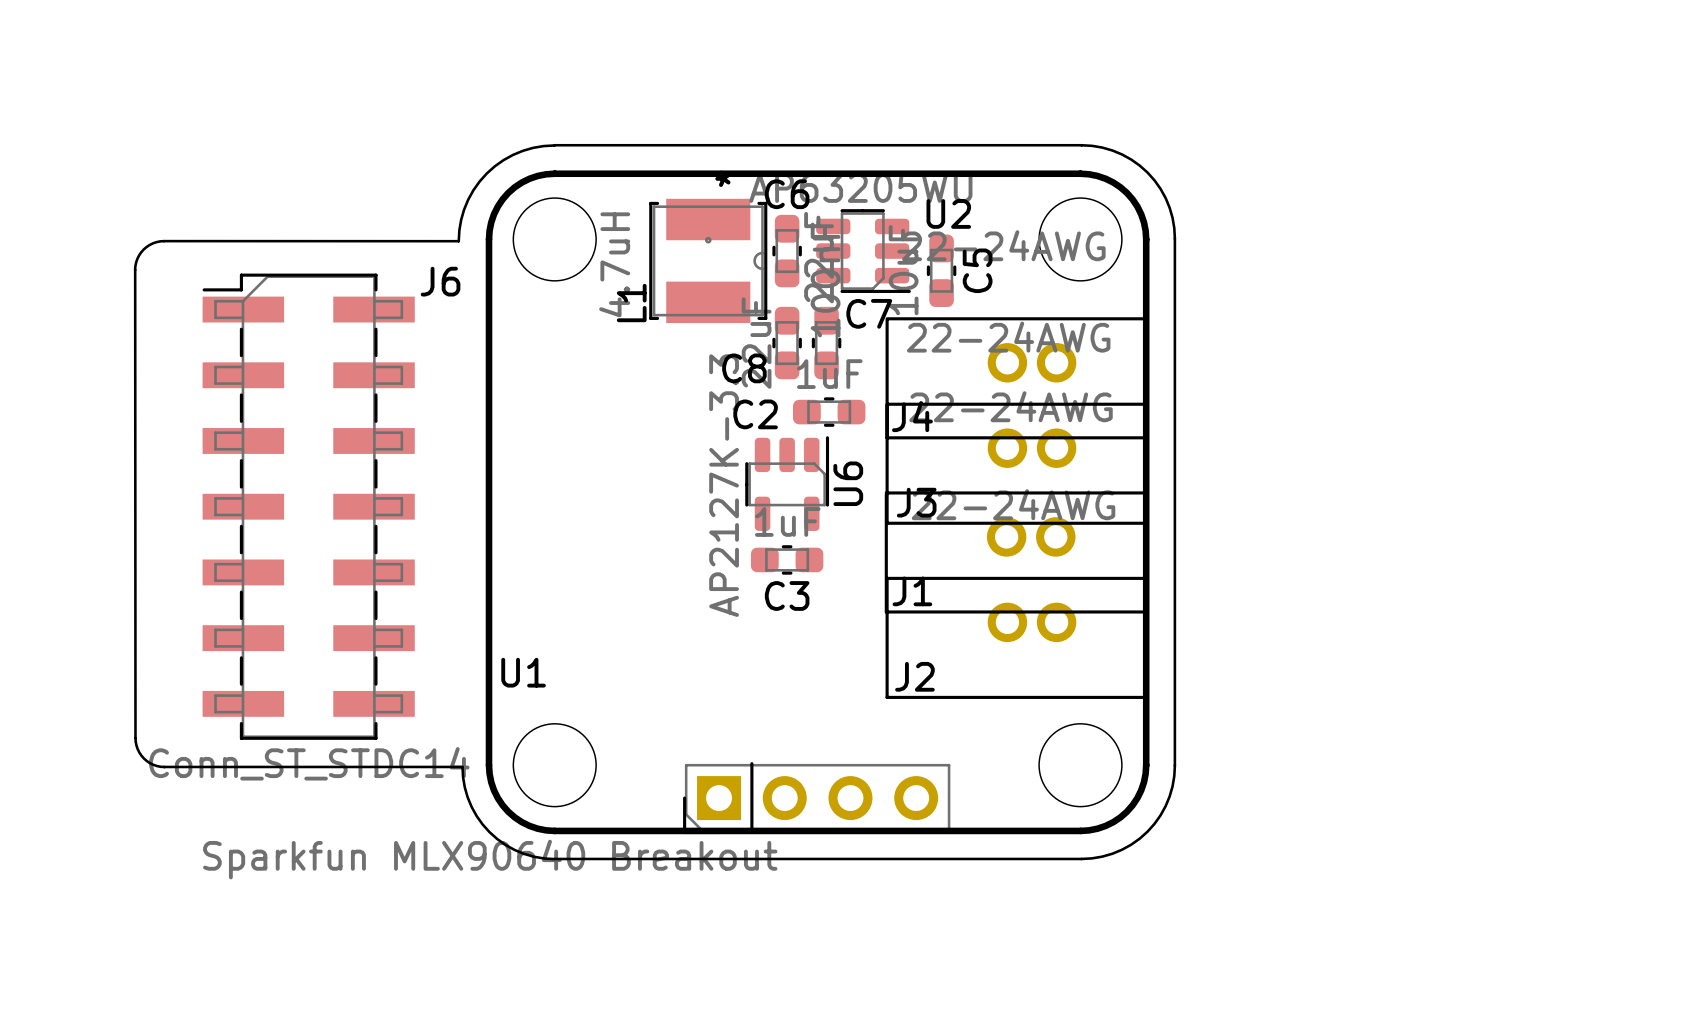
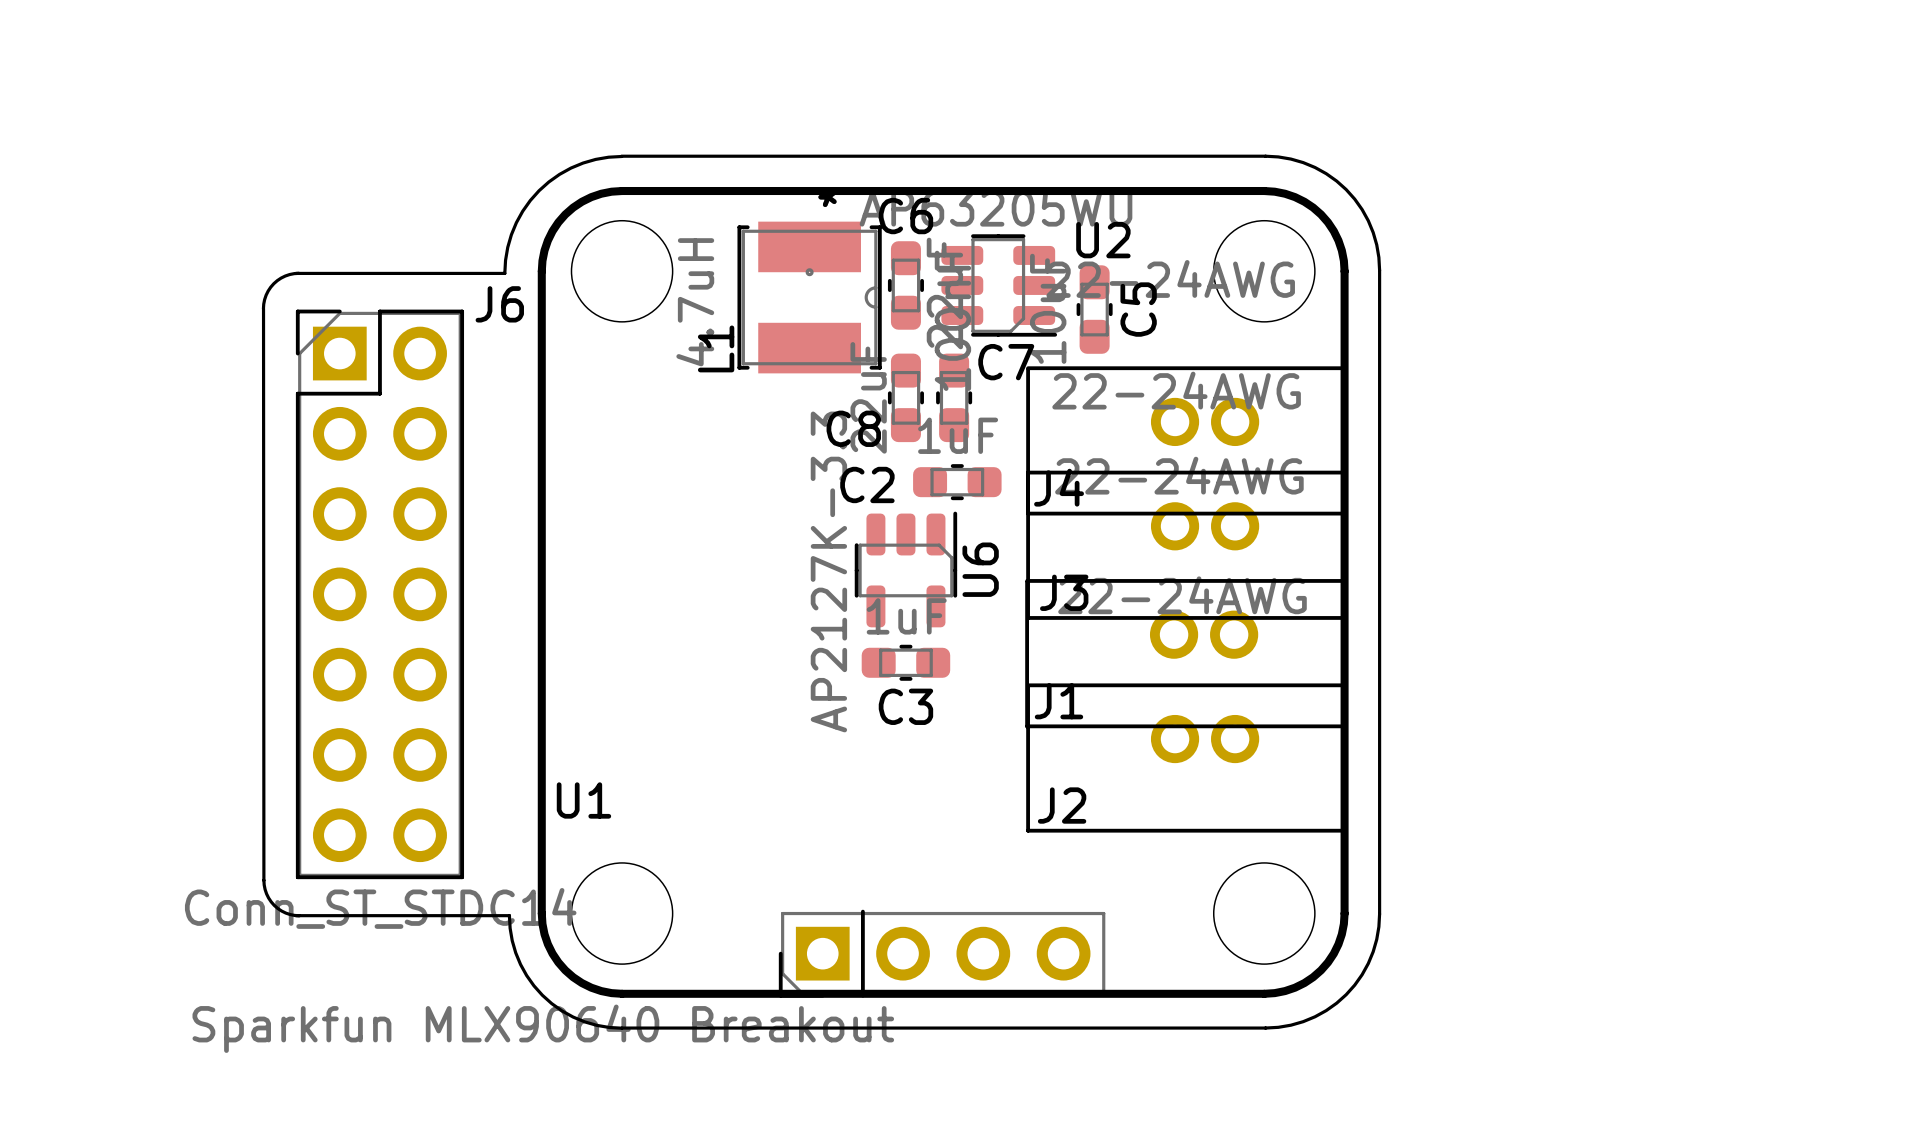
board edge: none -> (298, 273) (285, 276) (273, 283) (266, 295) (263, 308)
board edge: (458, 241) (160, 241) (143, 249) (137, 259) (135, 270) -> (504, 273) (295, 273)
board edge: (135, 270) (135, 738) (137, 749) (143, 758) (153, 764) (164, 767) -> (263, 308) (263, 880) (266, 893) (274, 905) (285, 913) (299, 915)
J6 footprint: [202, 273, 415, 740] -> [295, 309, 465, 880]
board edge: (164, 766) (287, 766) -> none

